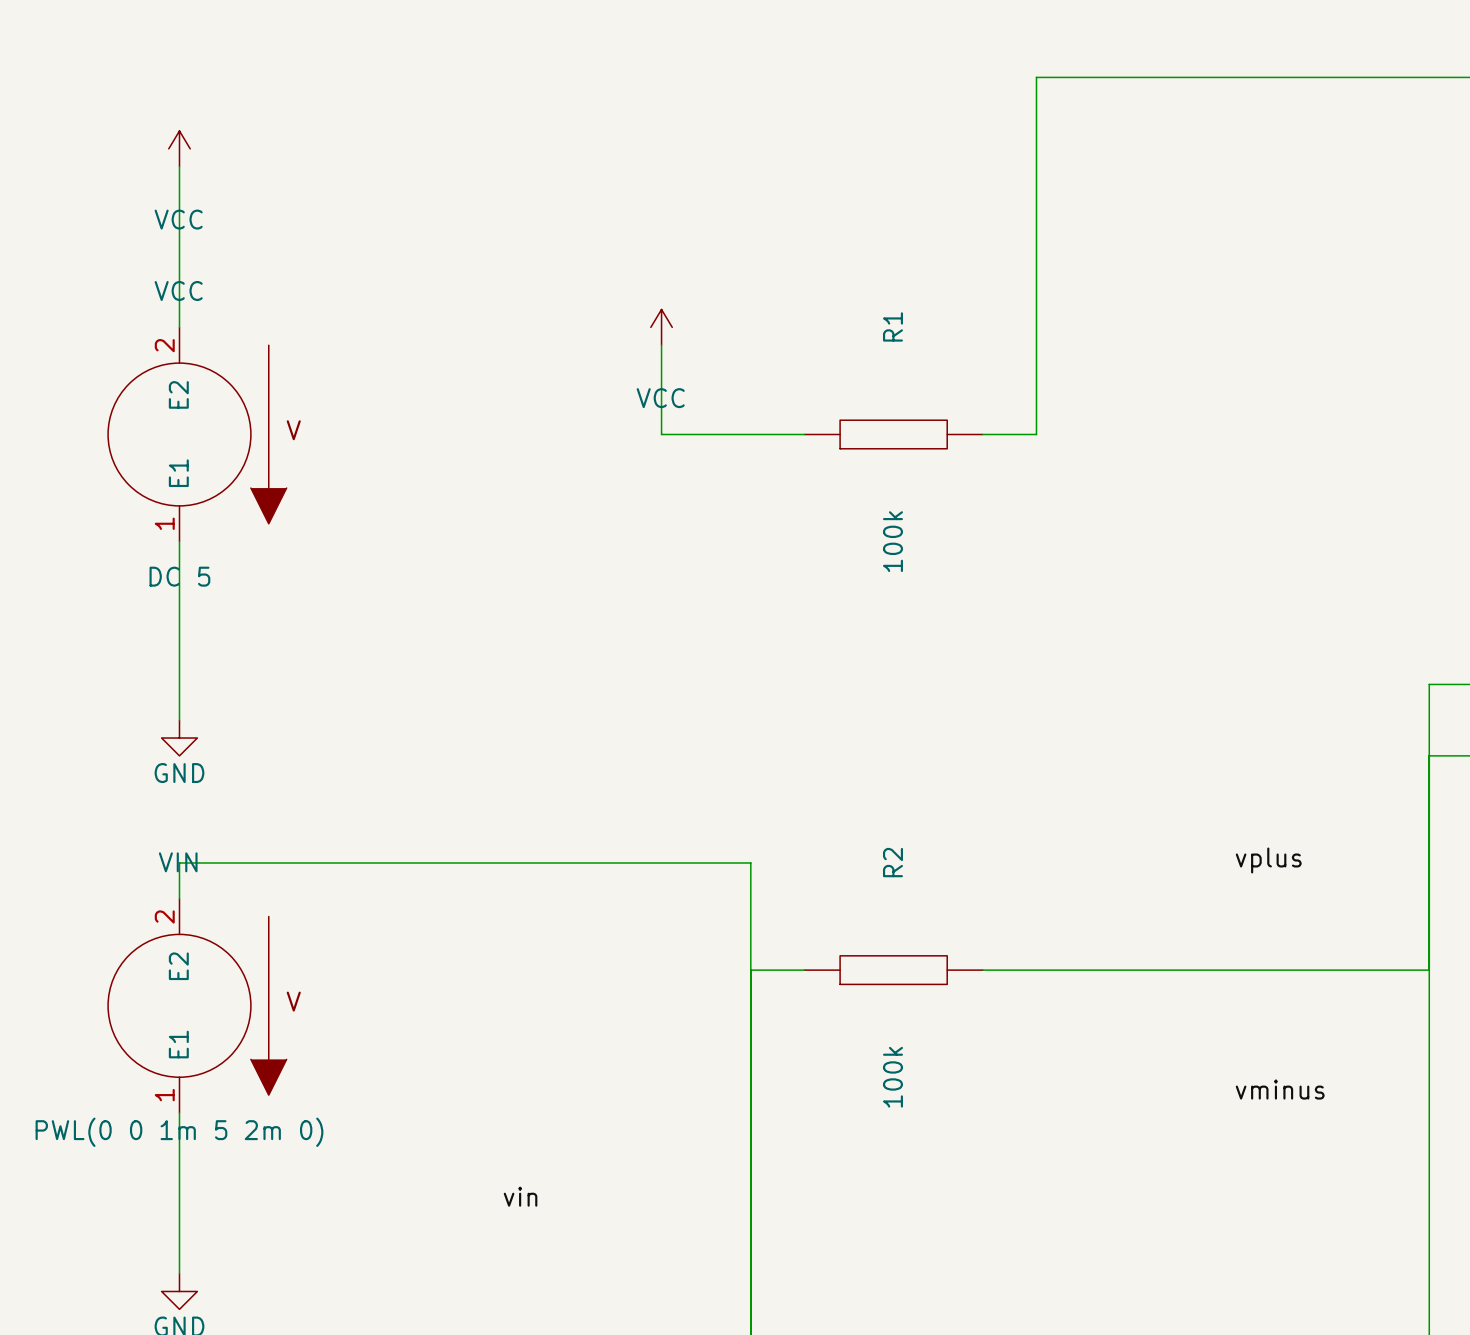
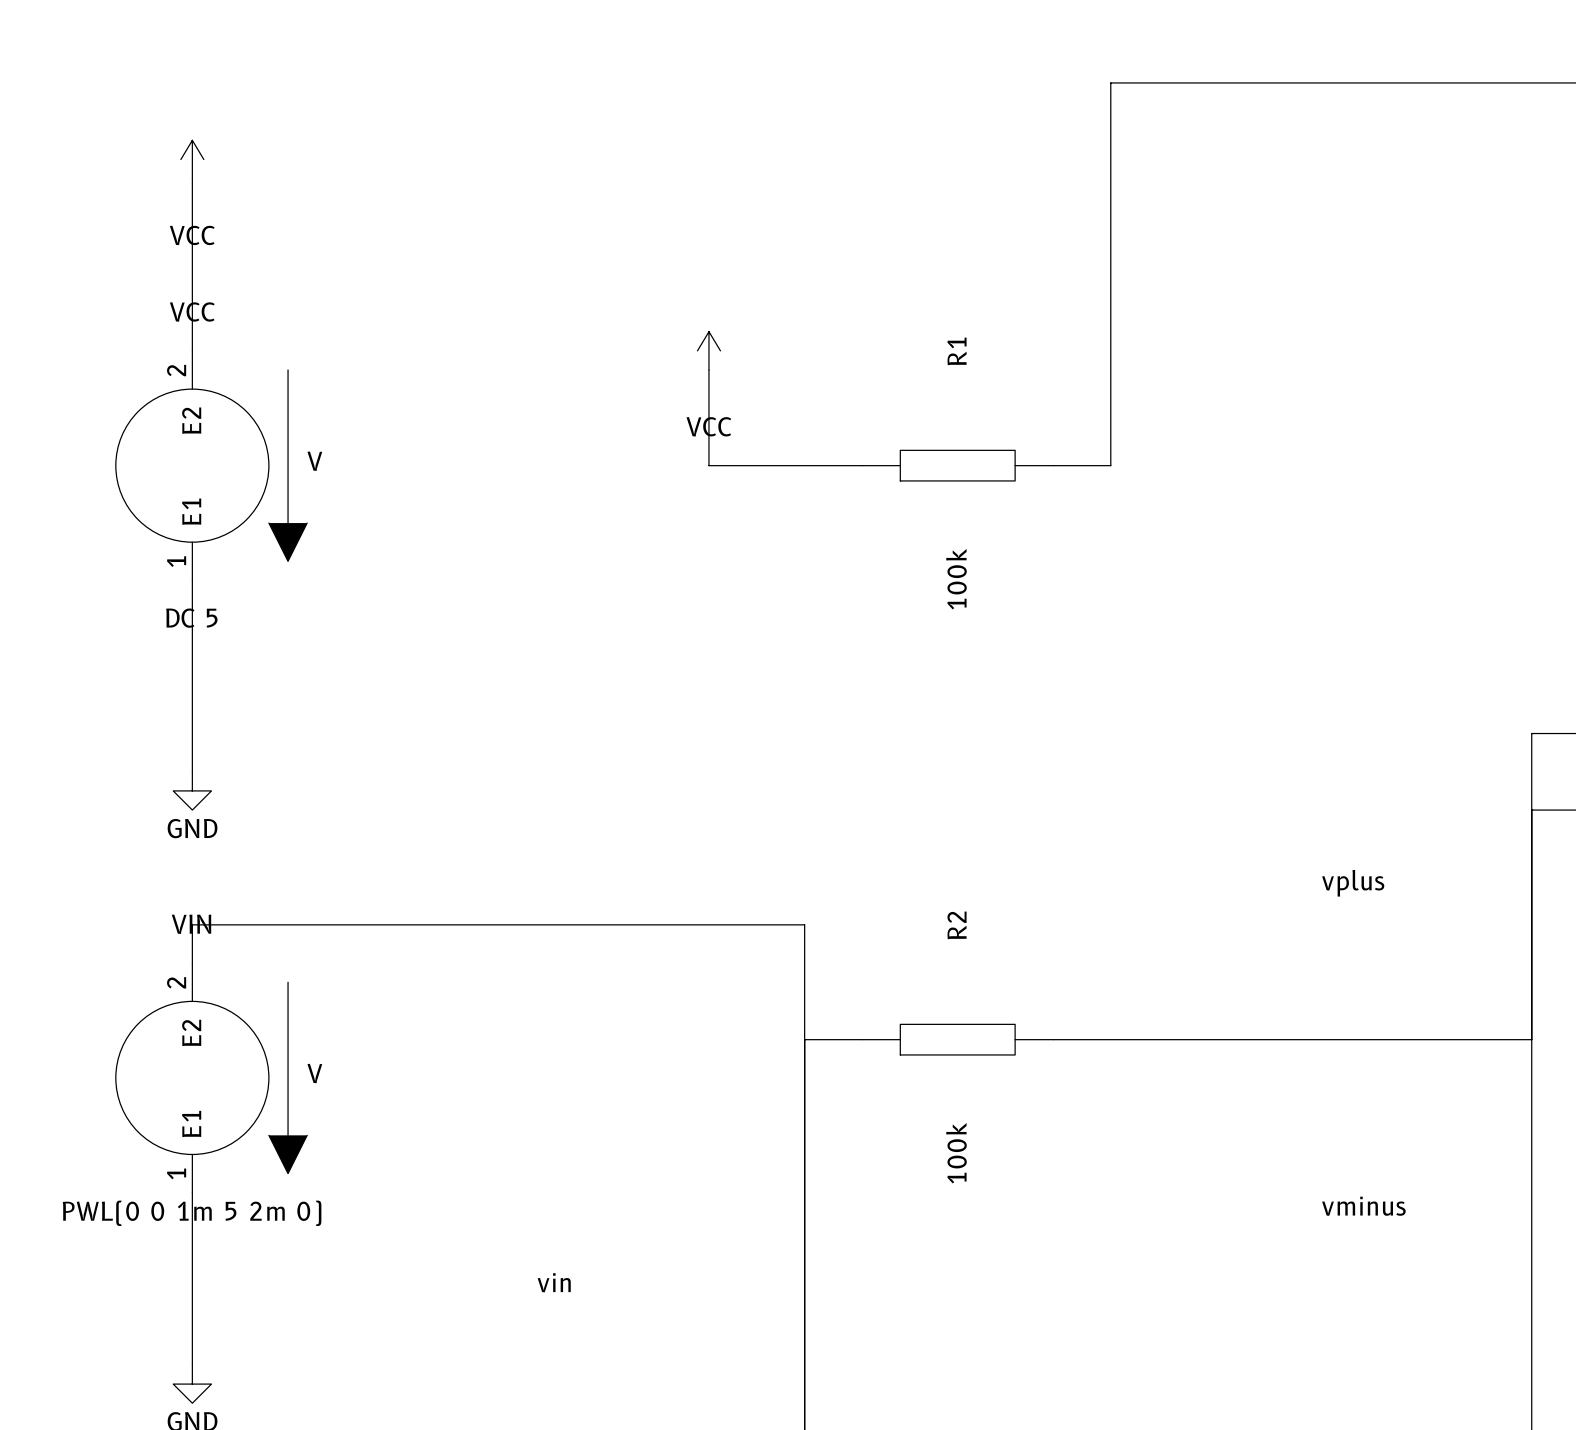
label position: vplus (1268, 860) -> vplus (1353, 883)
label position: vminus (1280, 1089) -> vminus (1363, 1206)

